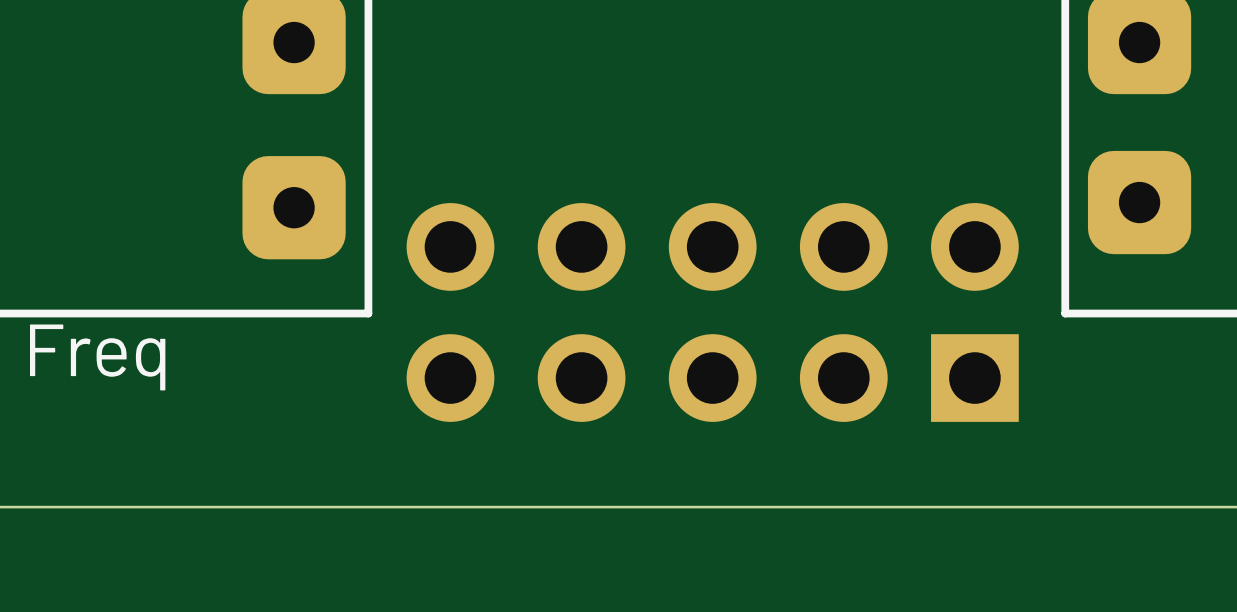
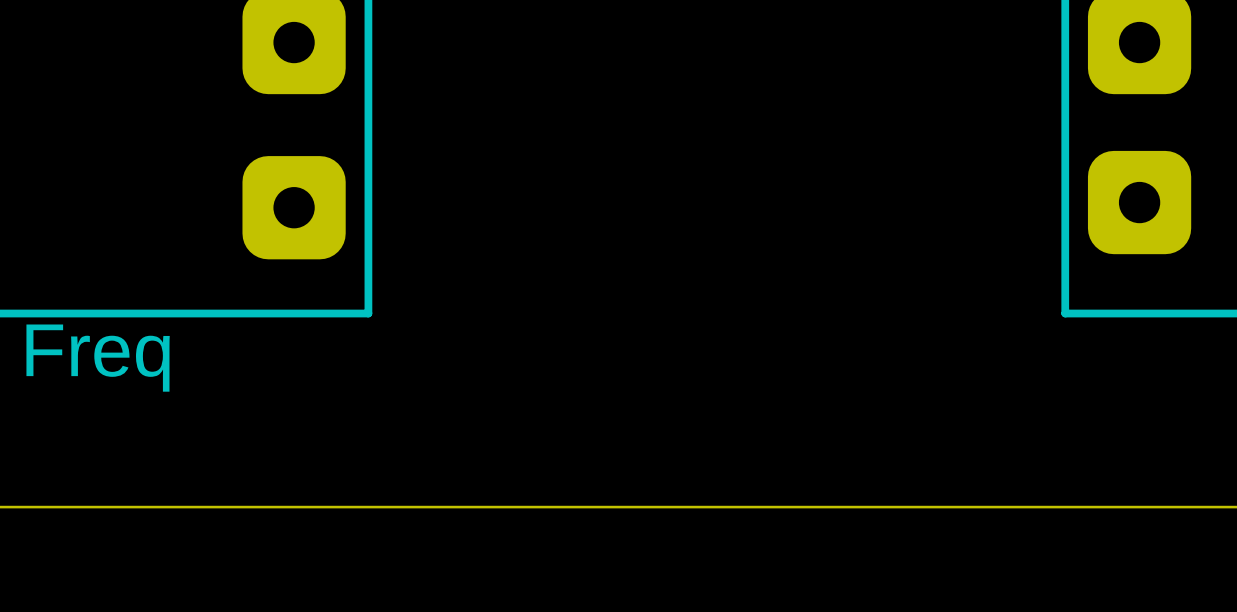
part: (712, 312) -> none

